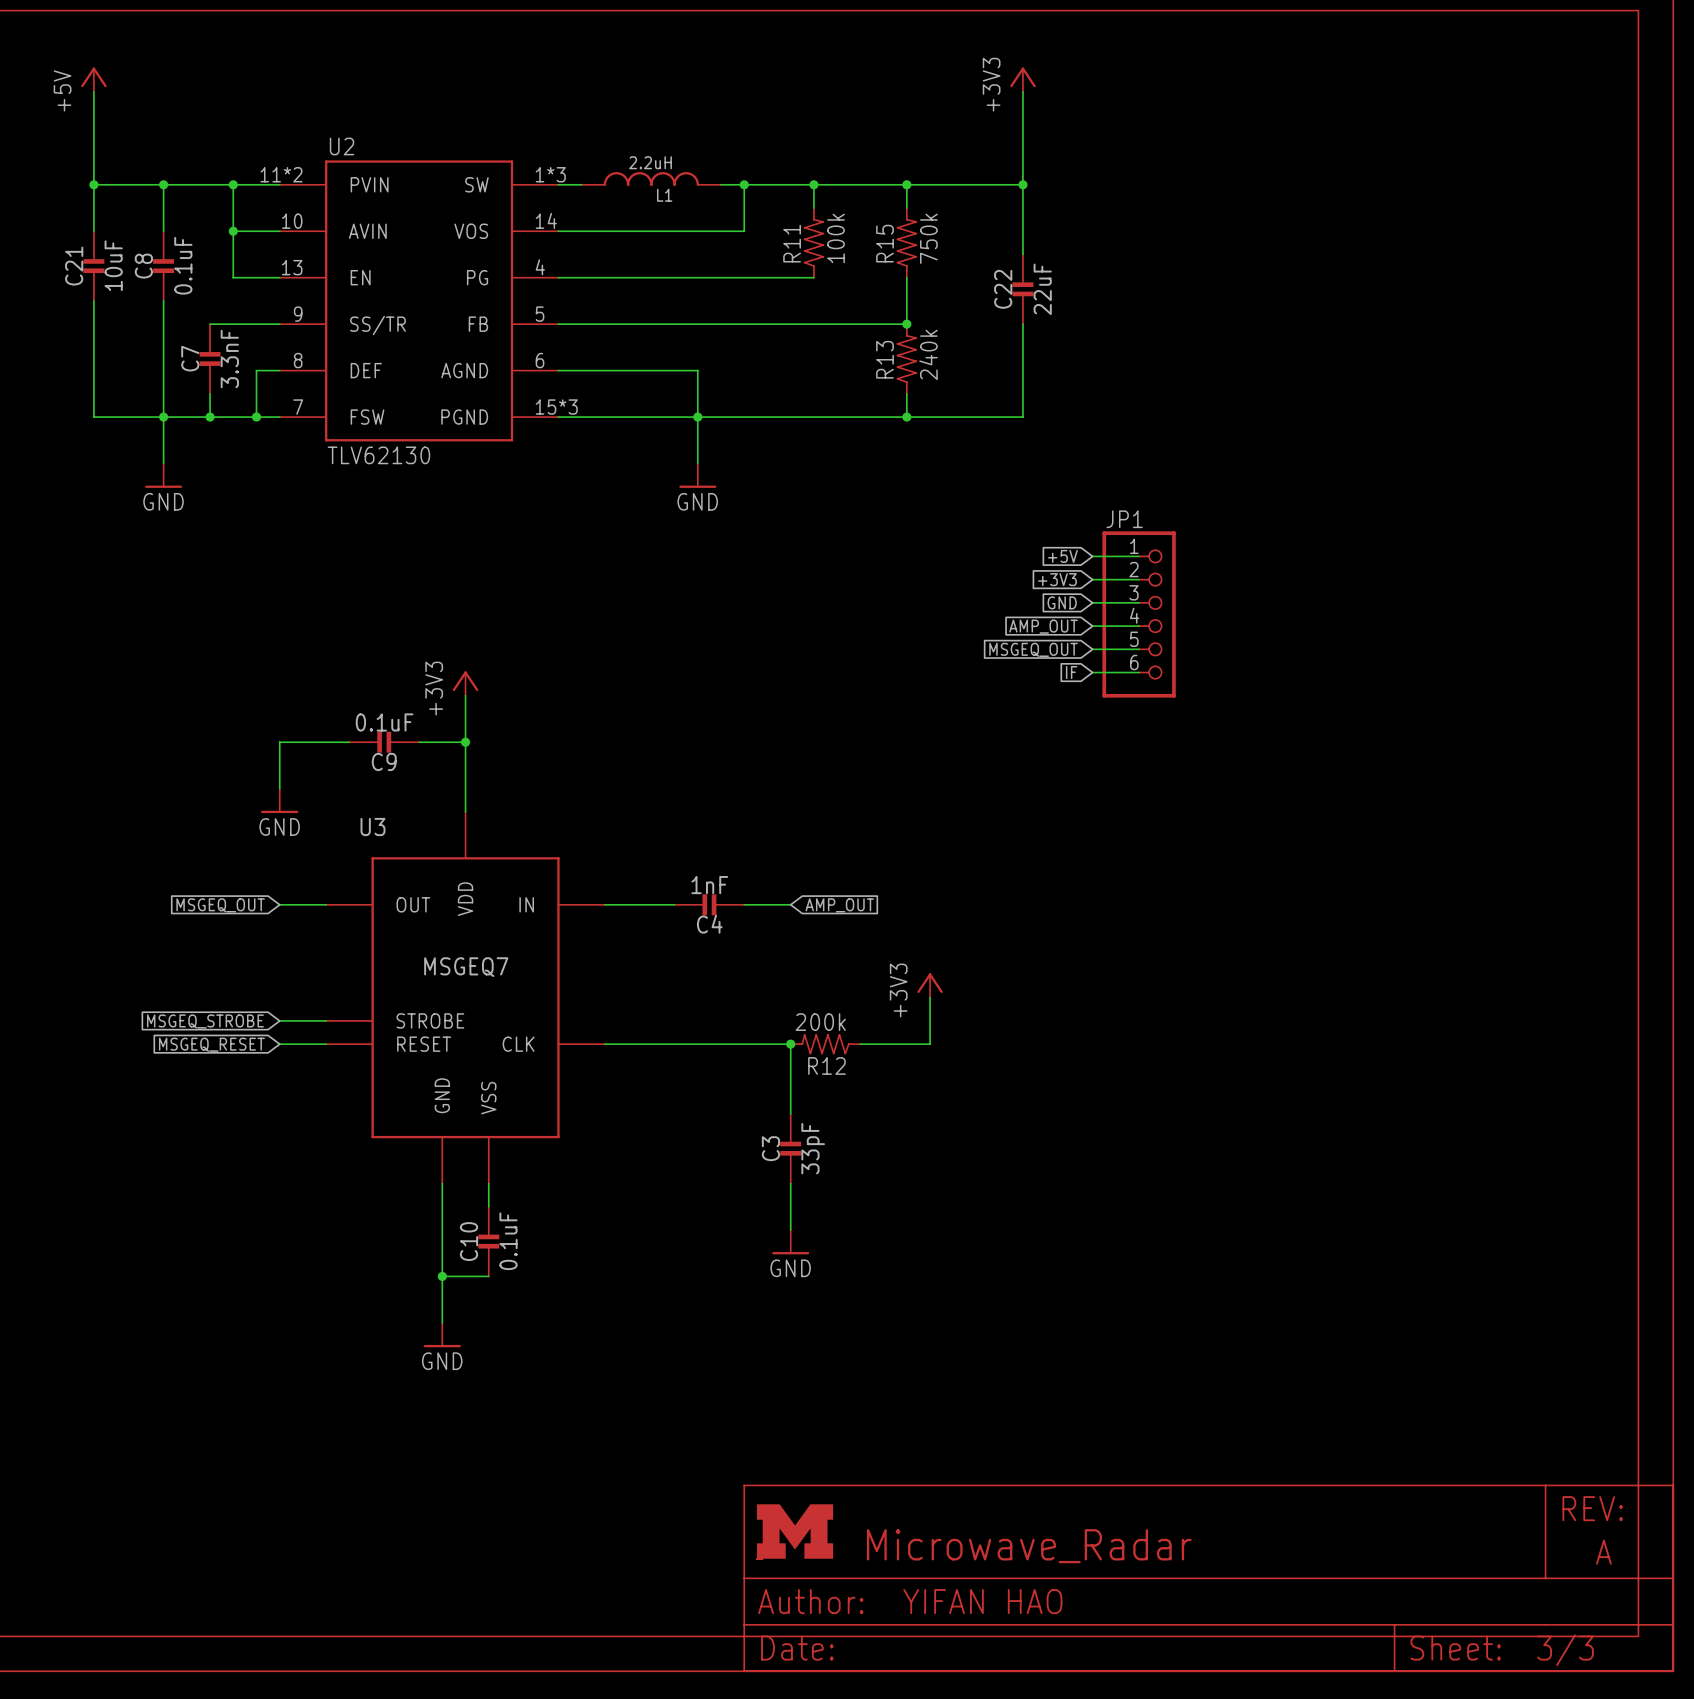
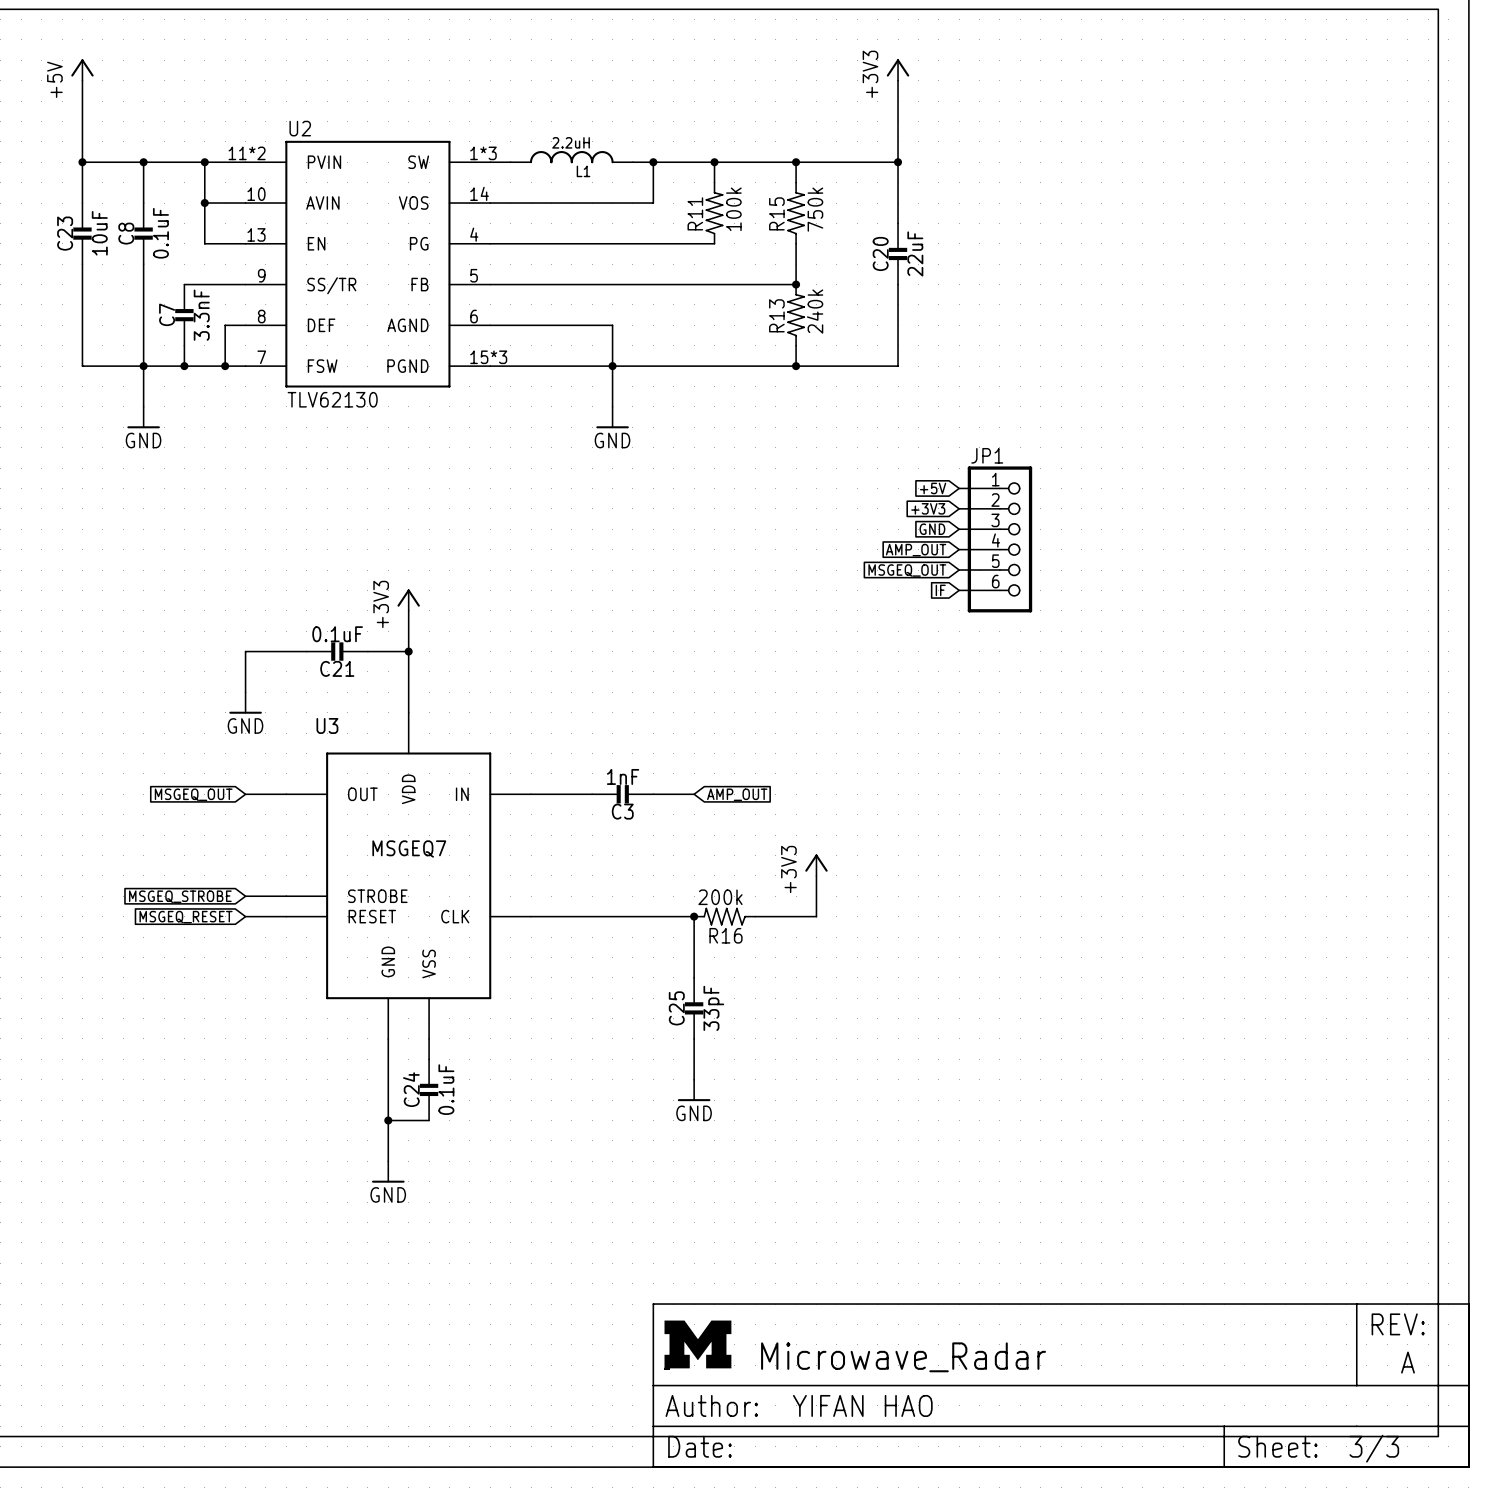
C21 name: C21 (74, 266) -> C23 (65, 233)
C22 name: C22 (1003, 289) -> C20 (880, 253)
C9 name: C9 (384, 761) -> C21 (337, 668)
C4 name: C4 (709, 924) -> C3 (622, 811)
R12 name: R12 (827, 1065) -> R16 (725, 935)
C3 name: C3 (770, 1148) -> C25 (676, 1008)
C10 name: C10 (469, 1241) -> C24 (411, 1089)

